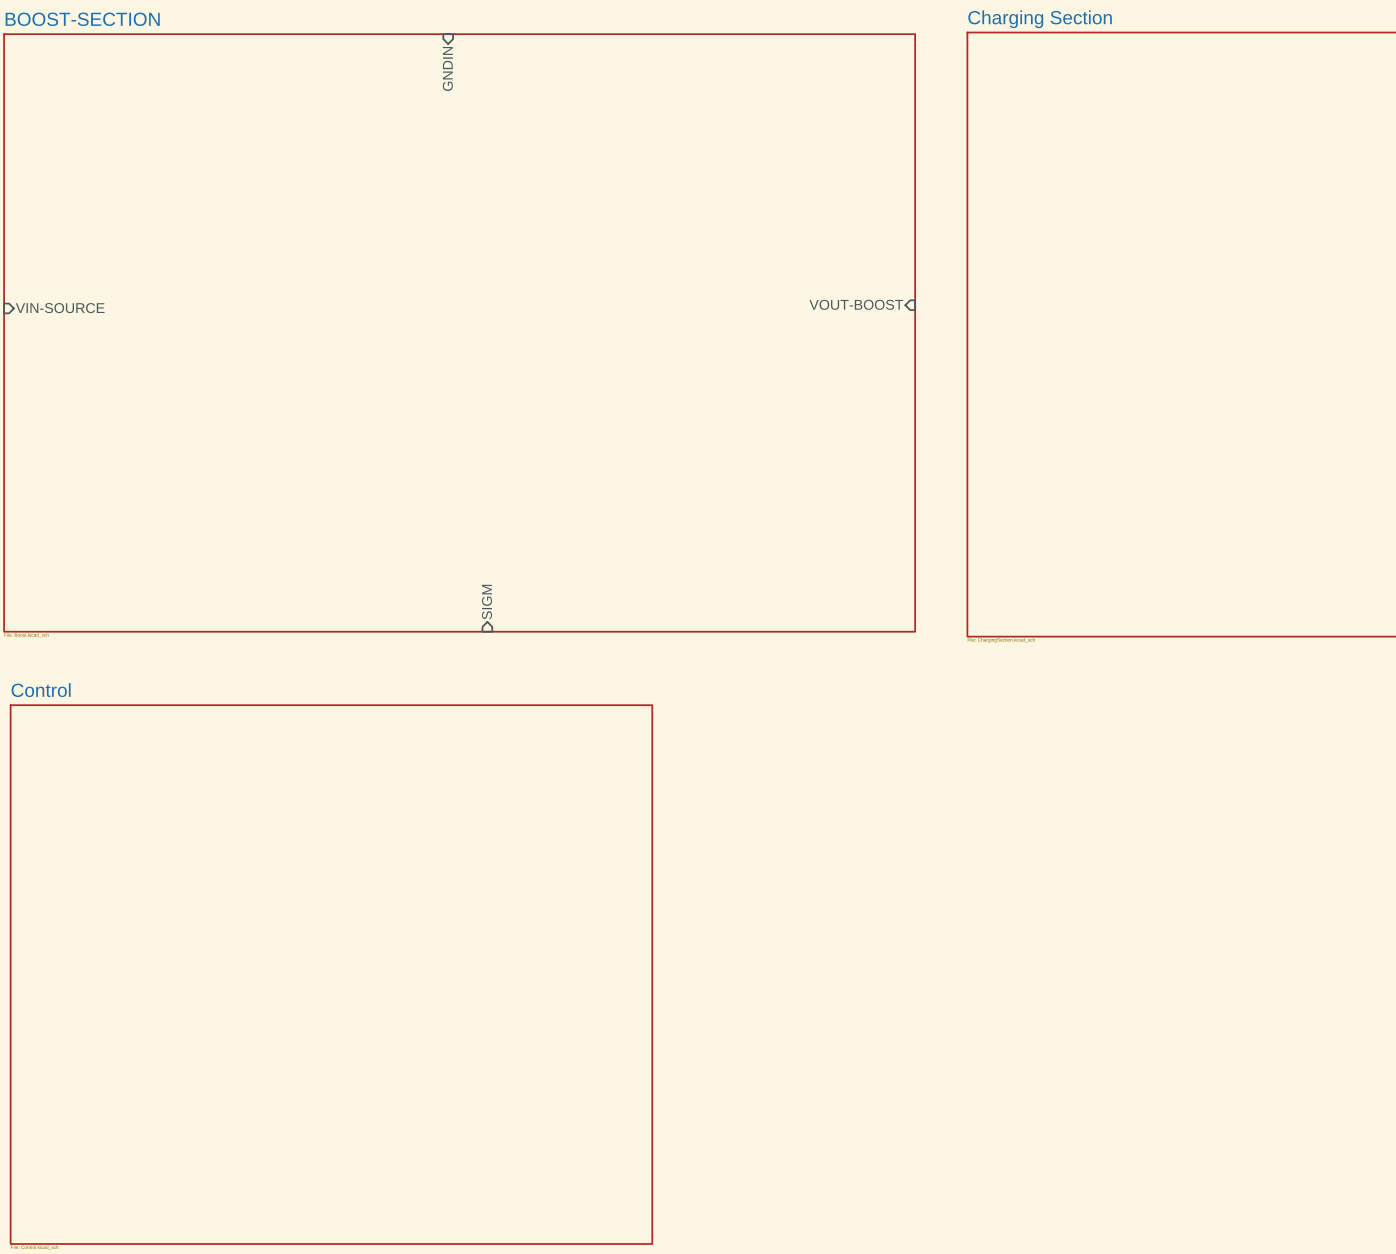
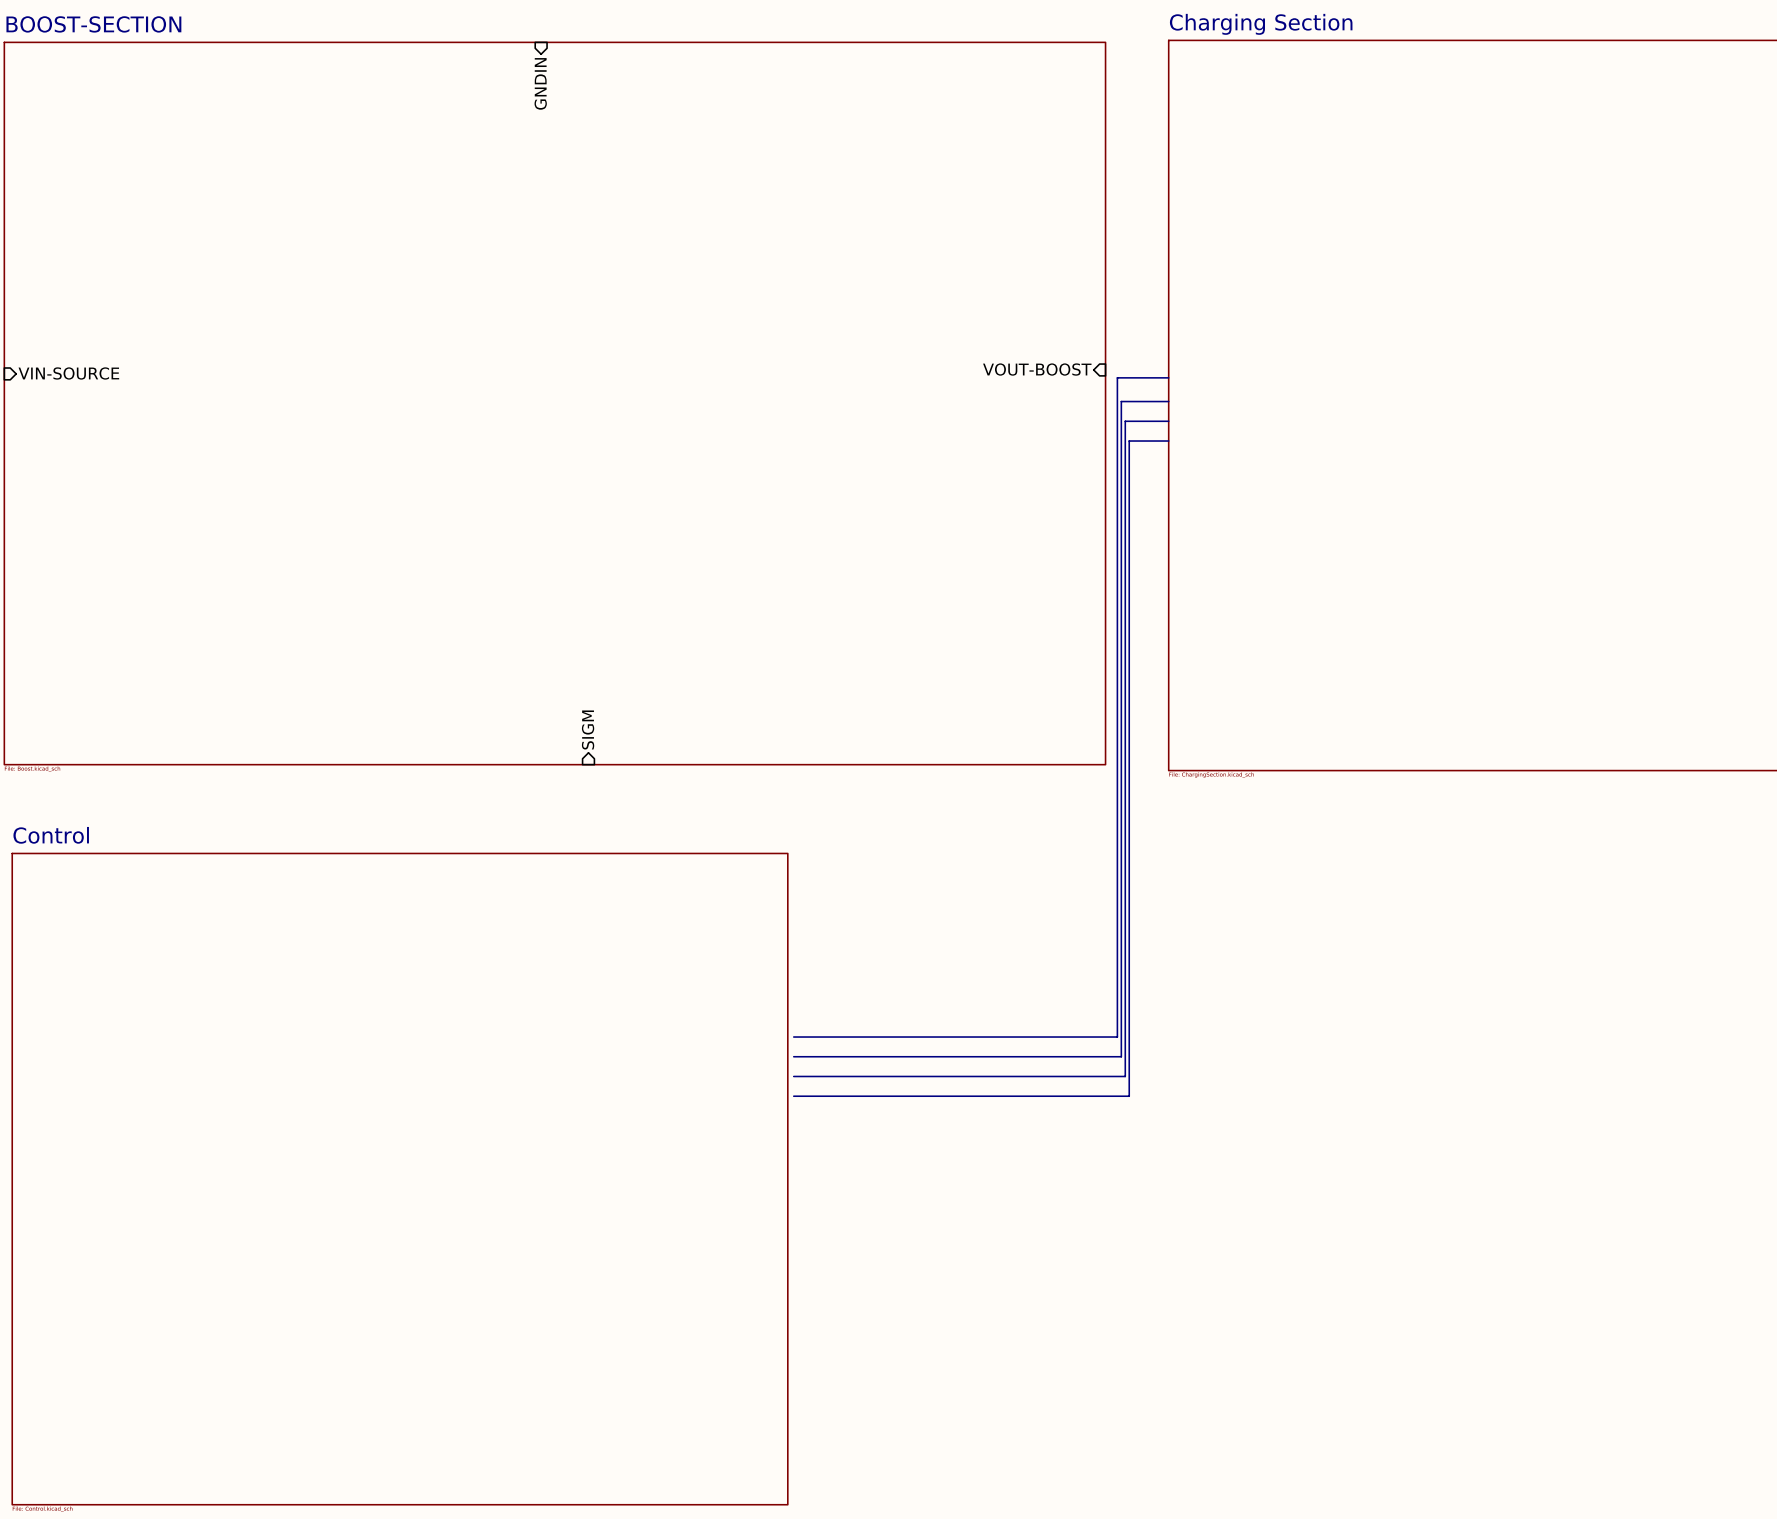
wire: none -> (1168, 377) (1117, 377) (1117, 1037) (793, 1037)
wire: none -> (1168, 401) (1121, 401) (1121, 1056) (793, 1056)
wire: none -> (1168, 421) (1125, 421) (1125, 1076) (793, 1076)
wire: none -> (1168, 441) (1129, 441) (1129, 1096) (793, 1096)

